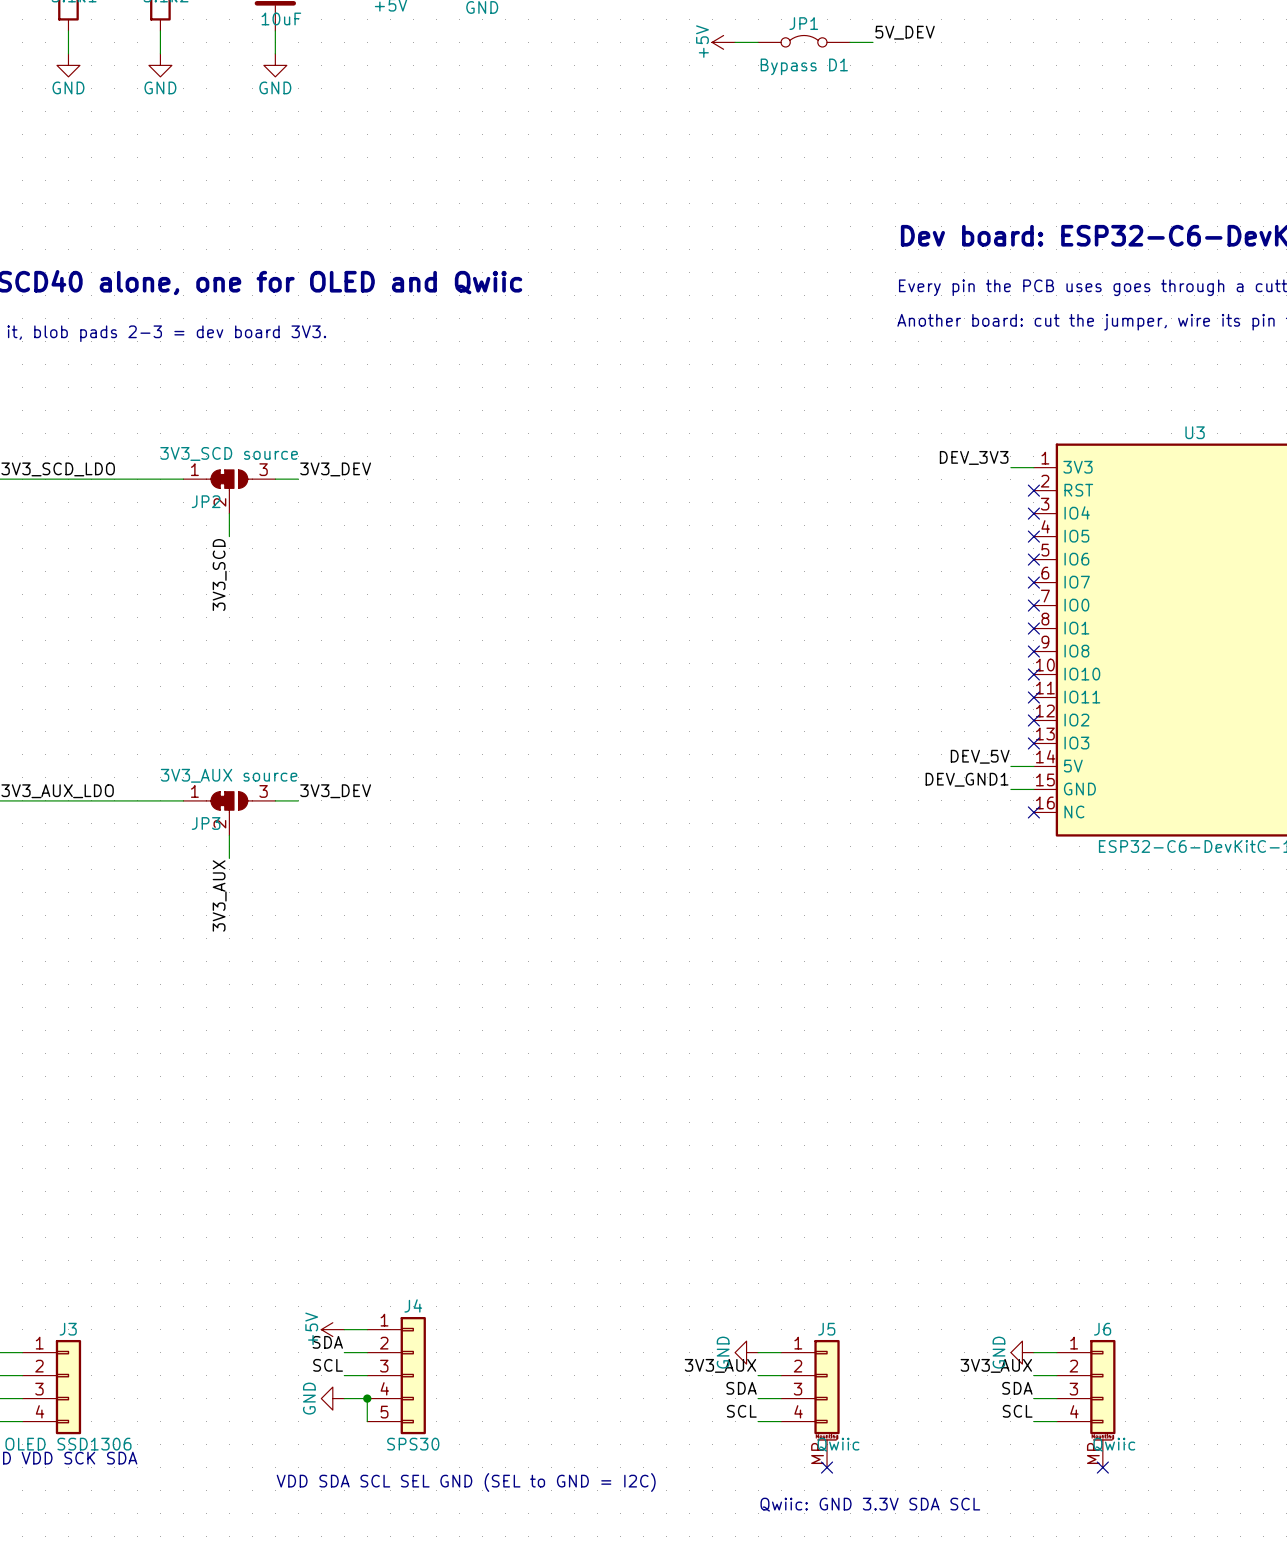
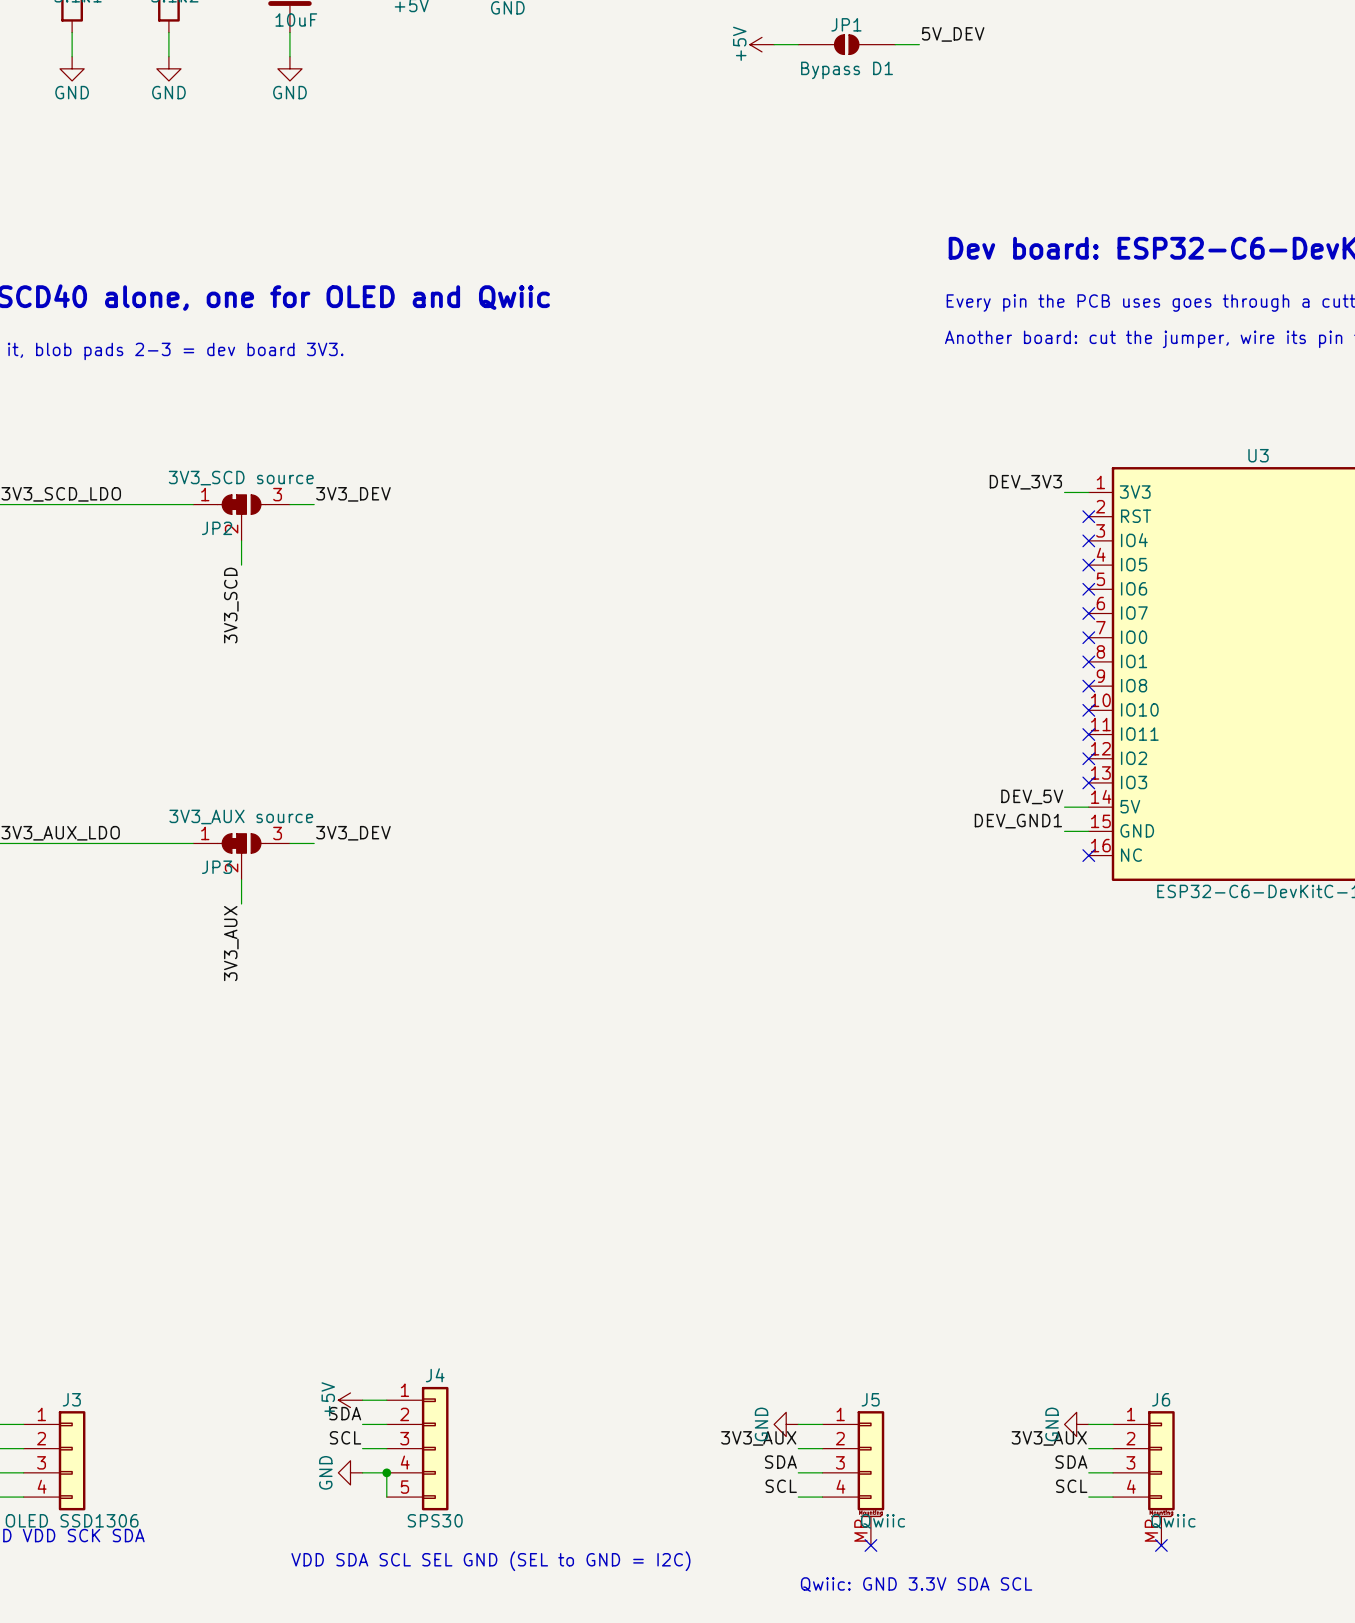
JP1 symbol: [758, 35, 851, 47] -> [798, 34, 896, 56]

